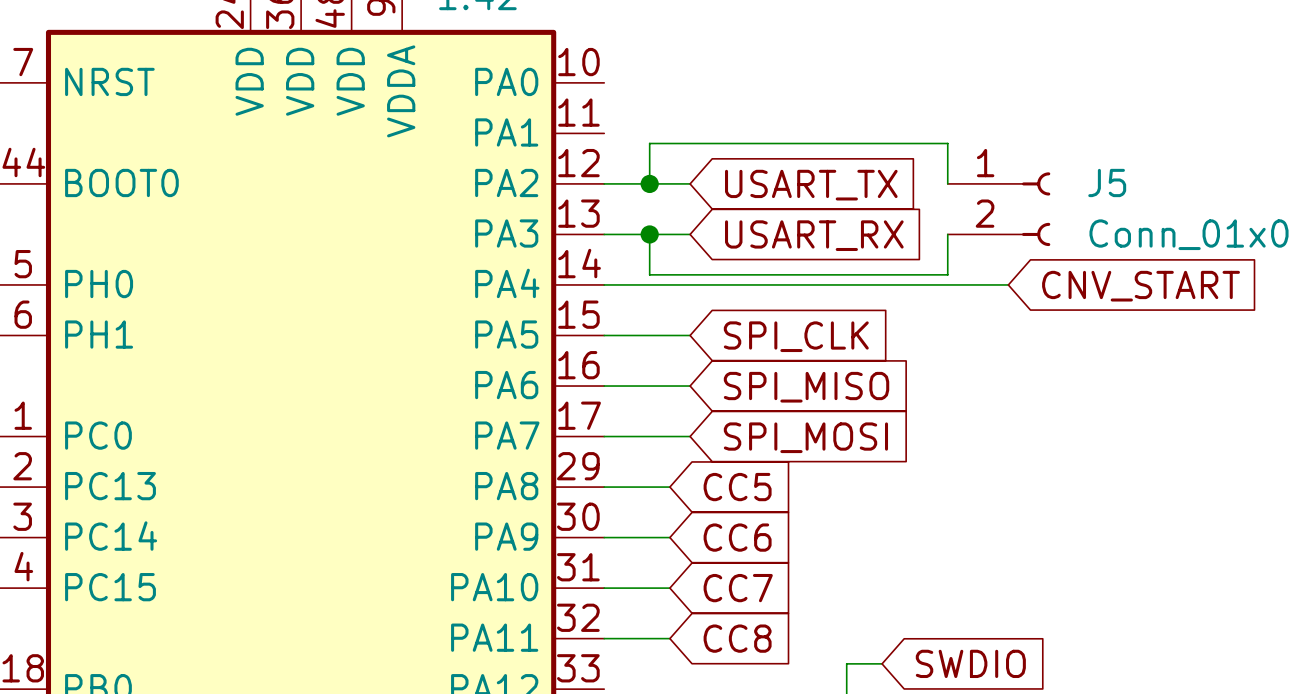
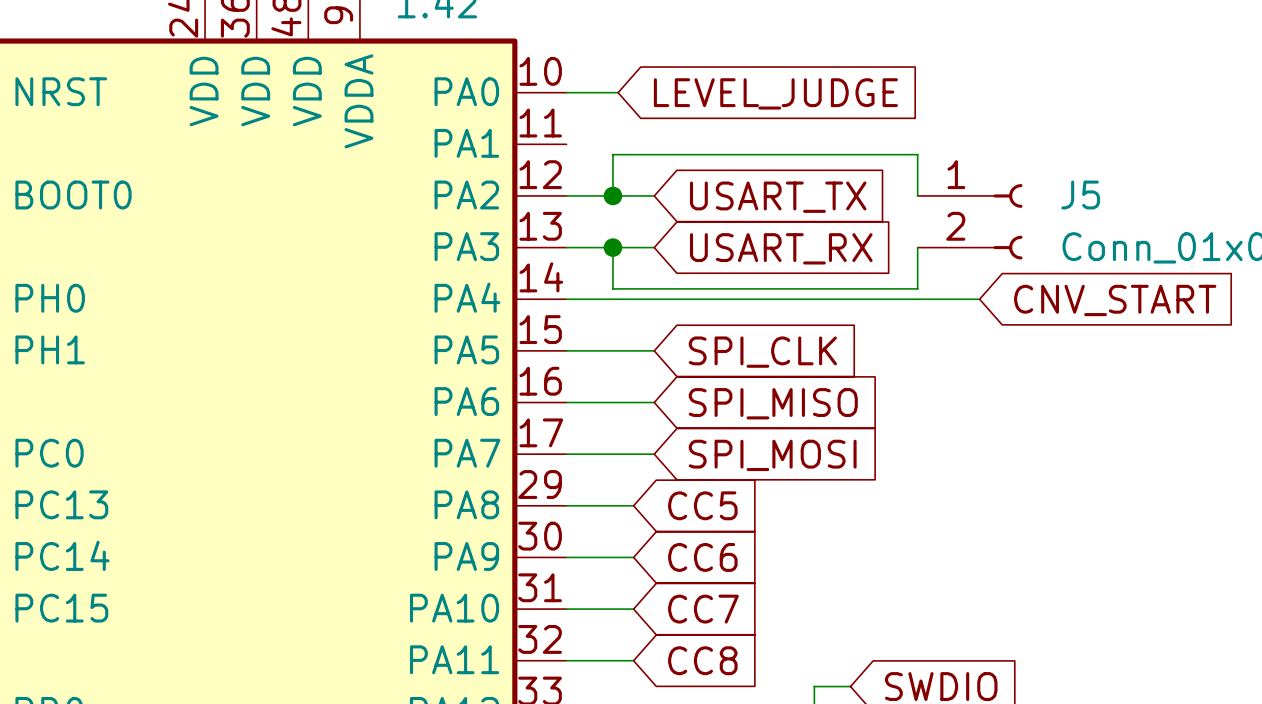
wire: none -> (566, 92) (618, 92)
global label: none -> LEVEL_JUDGE (775, 93)

